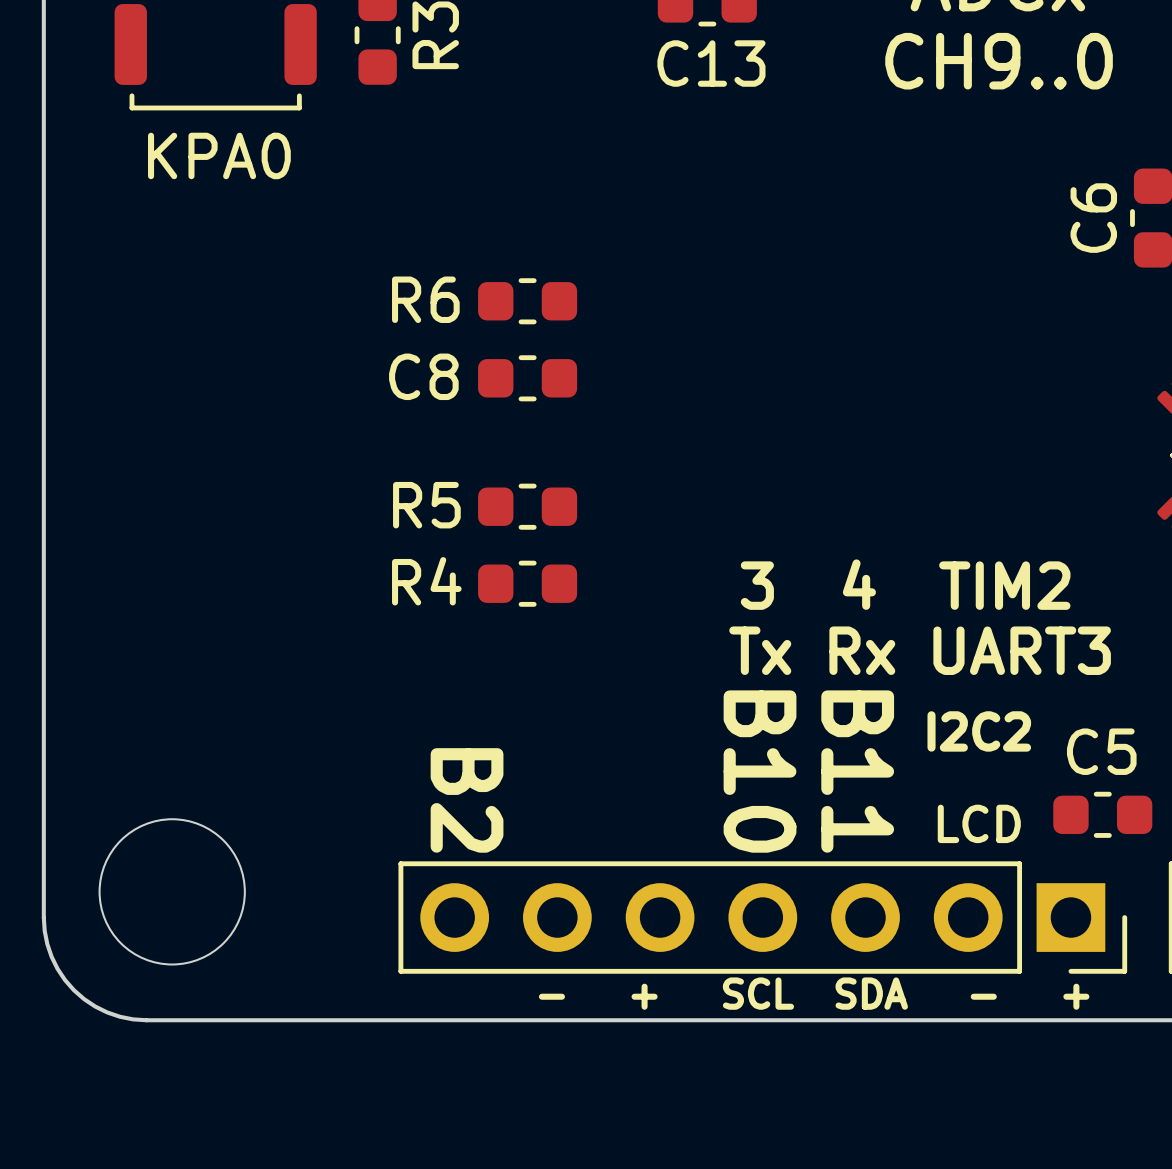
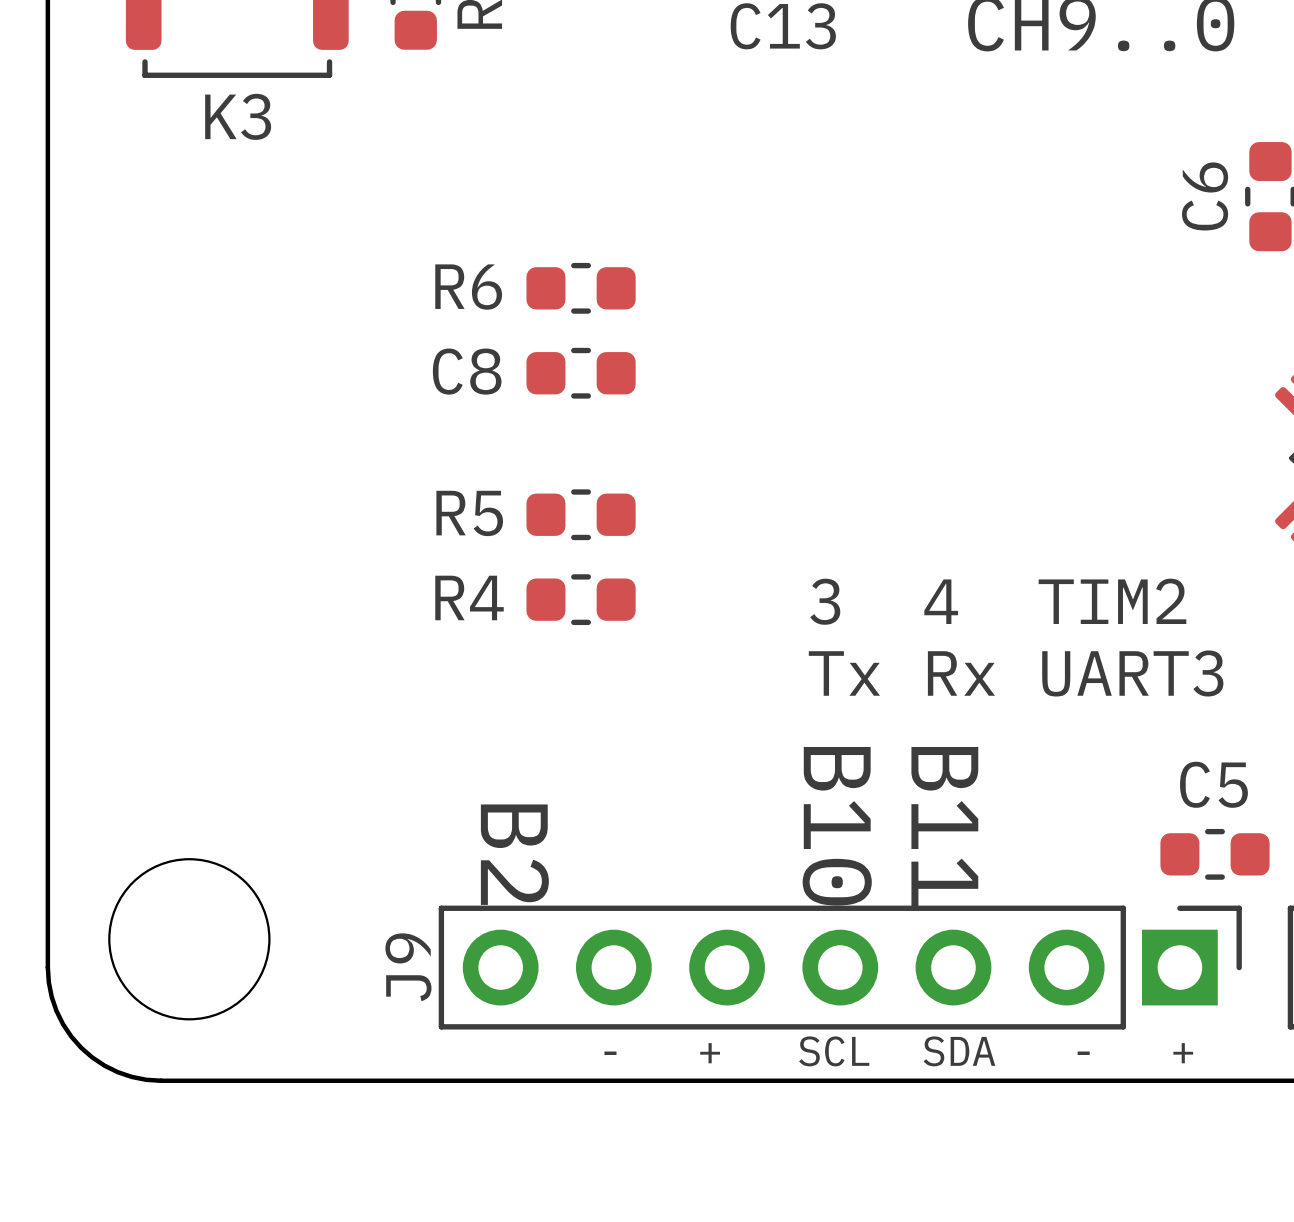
K3 name: none -> K3 (238, 116)
text: KPA0 (219, 155) -> none
text: I2C2 (979, 731) -> none
text: LCD (979, 823) -> none
part: (762, 917) -> none
J9: none -> (840, 967)

